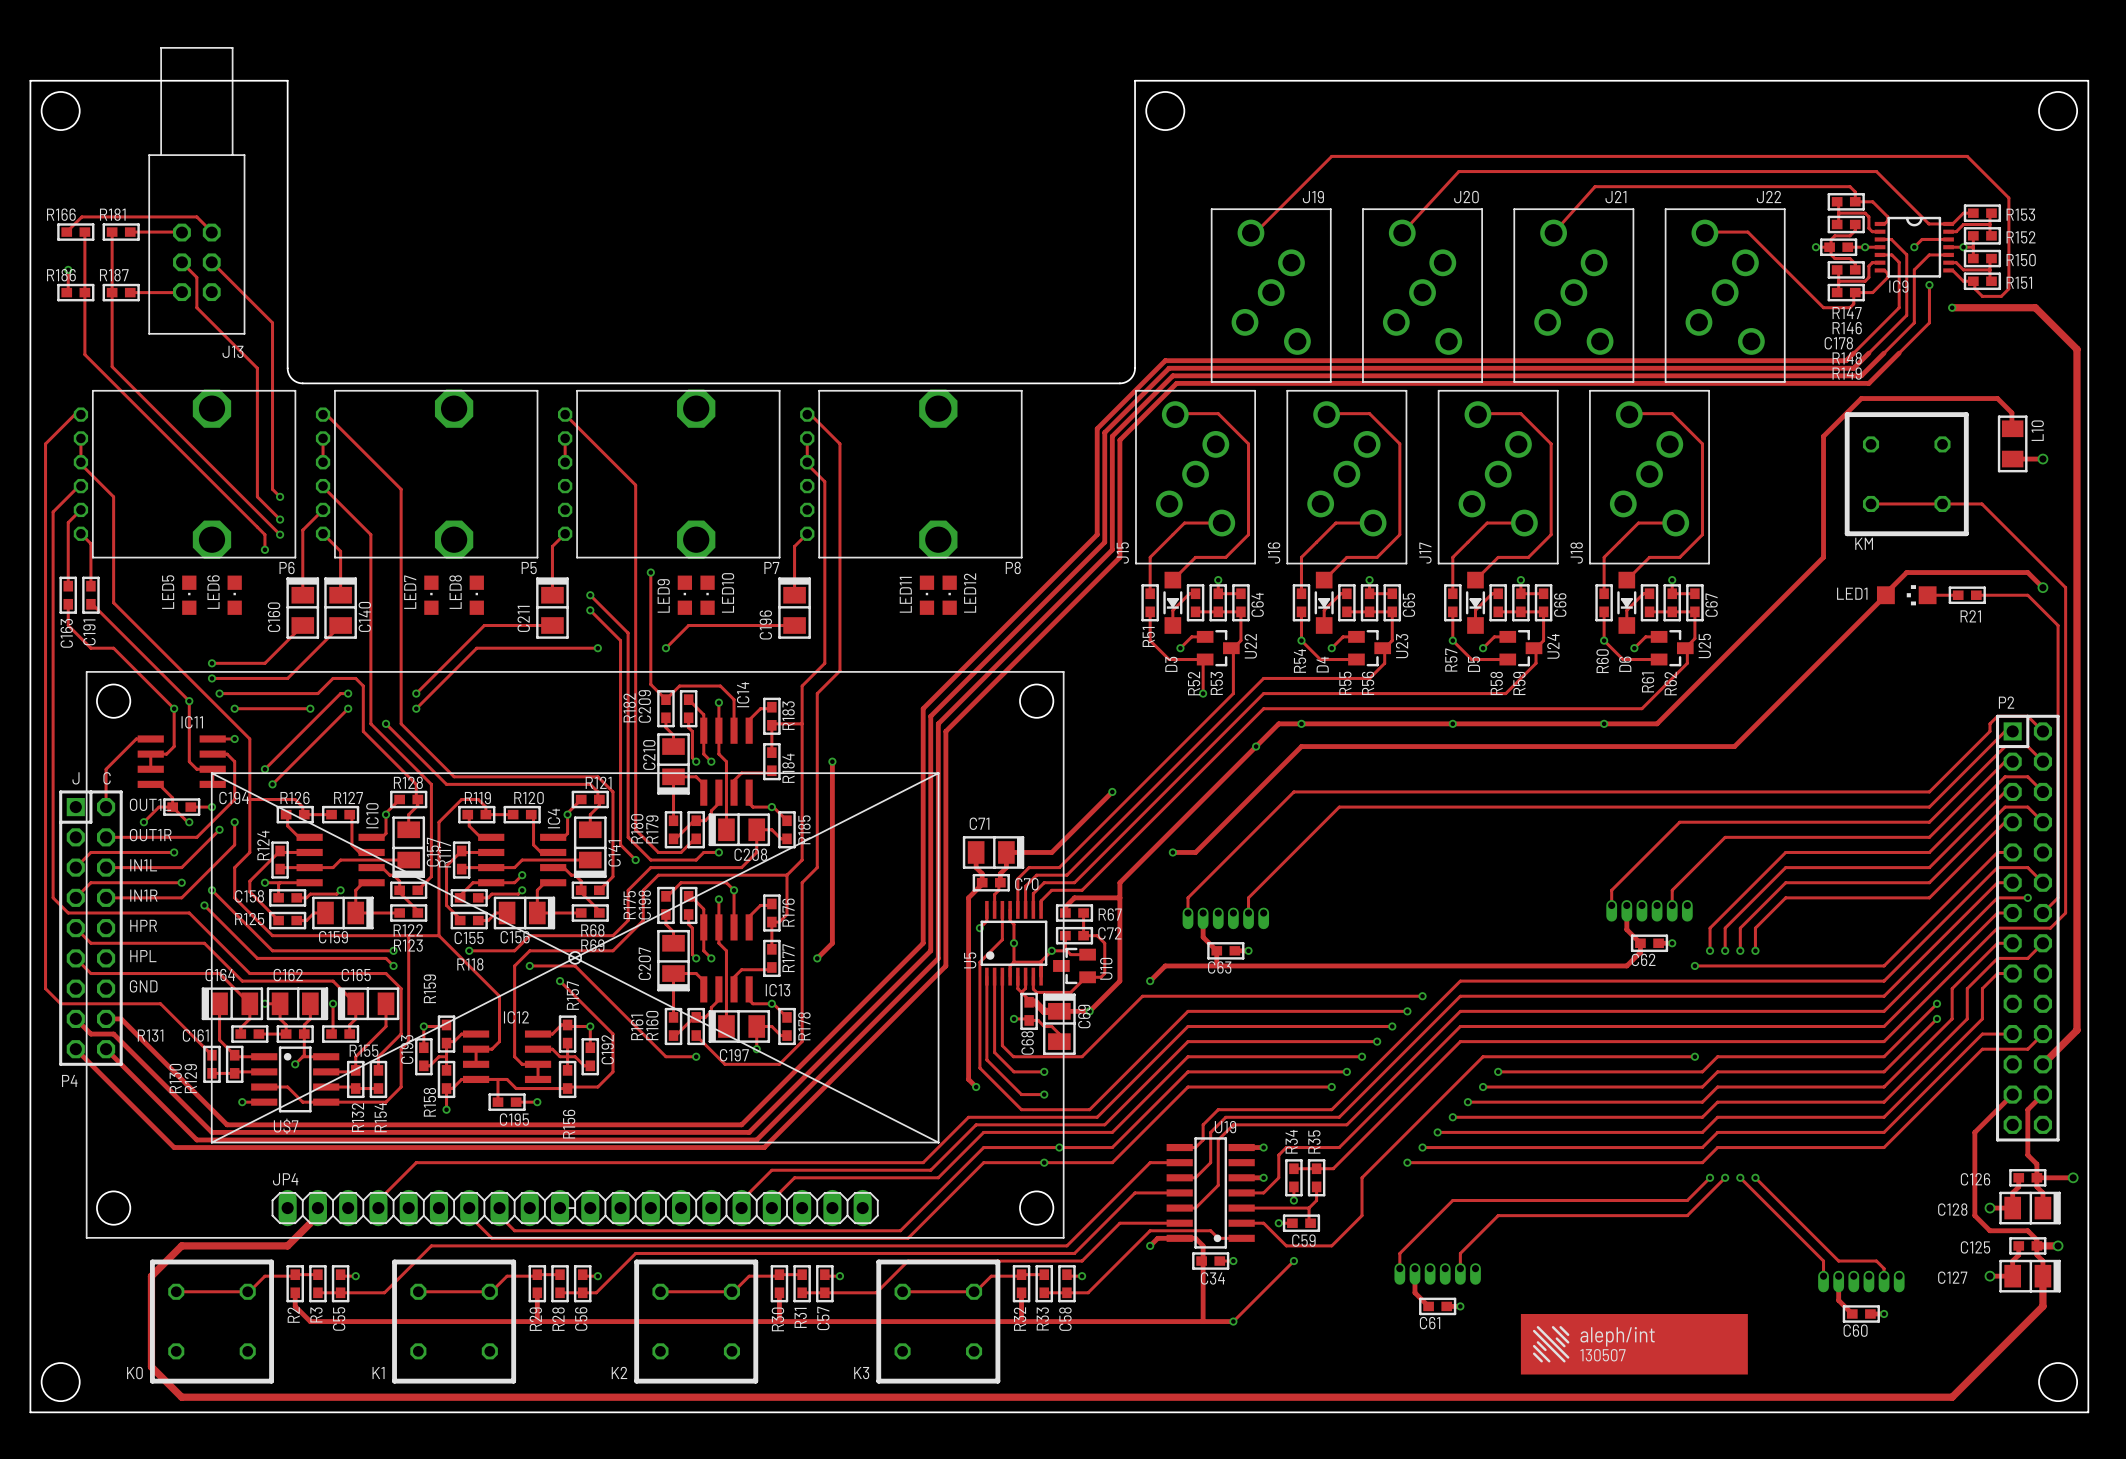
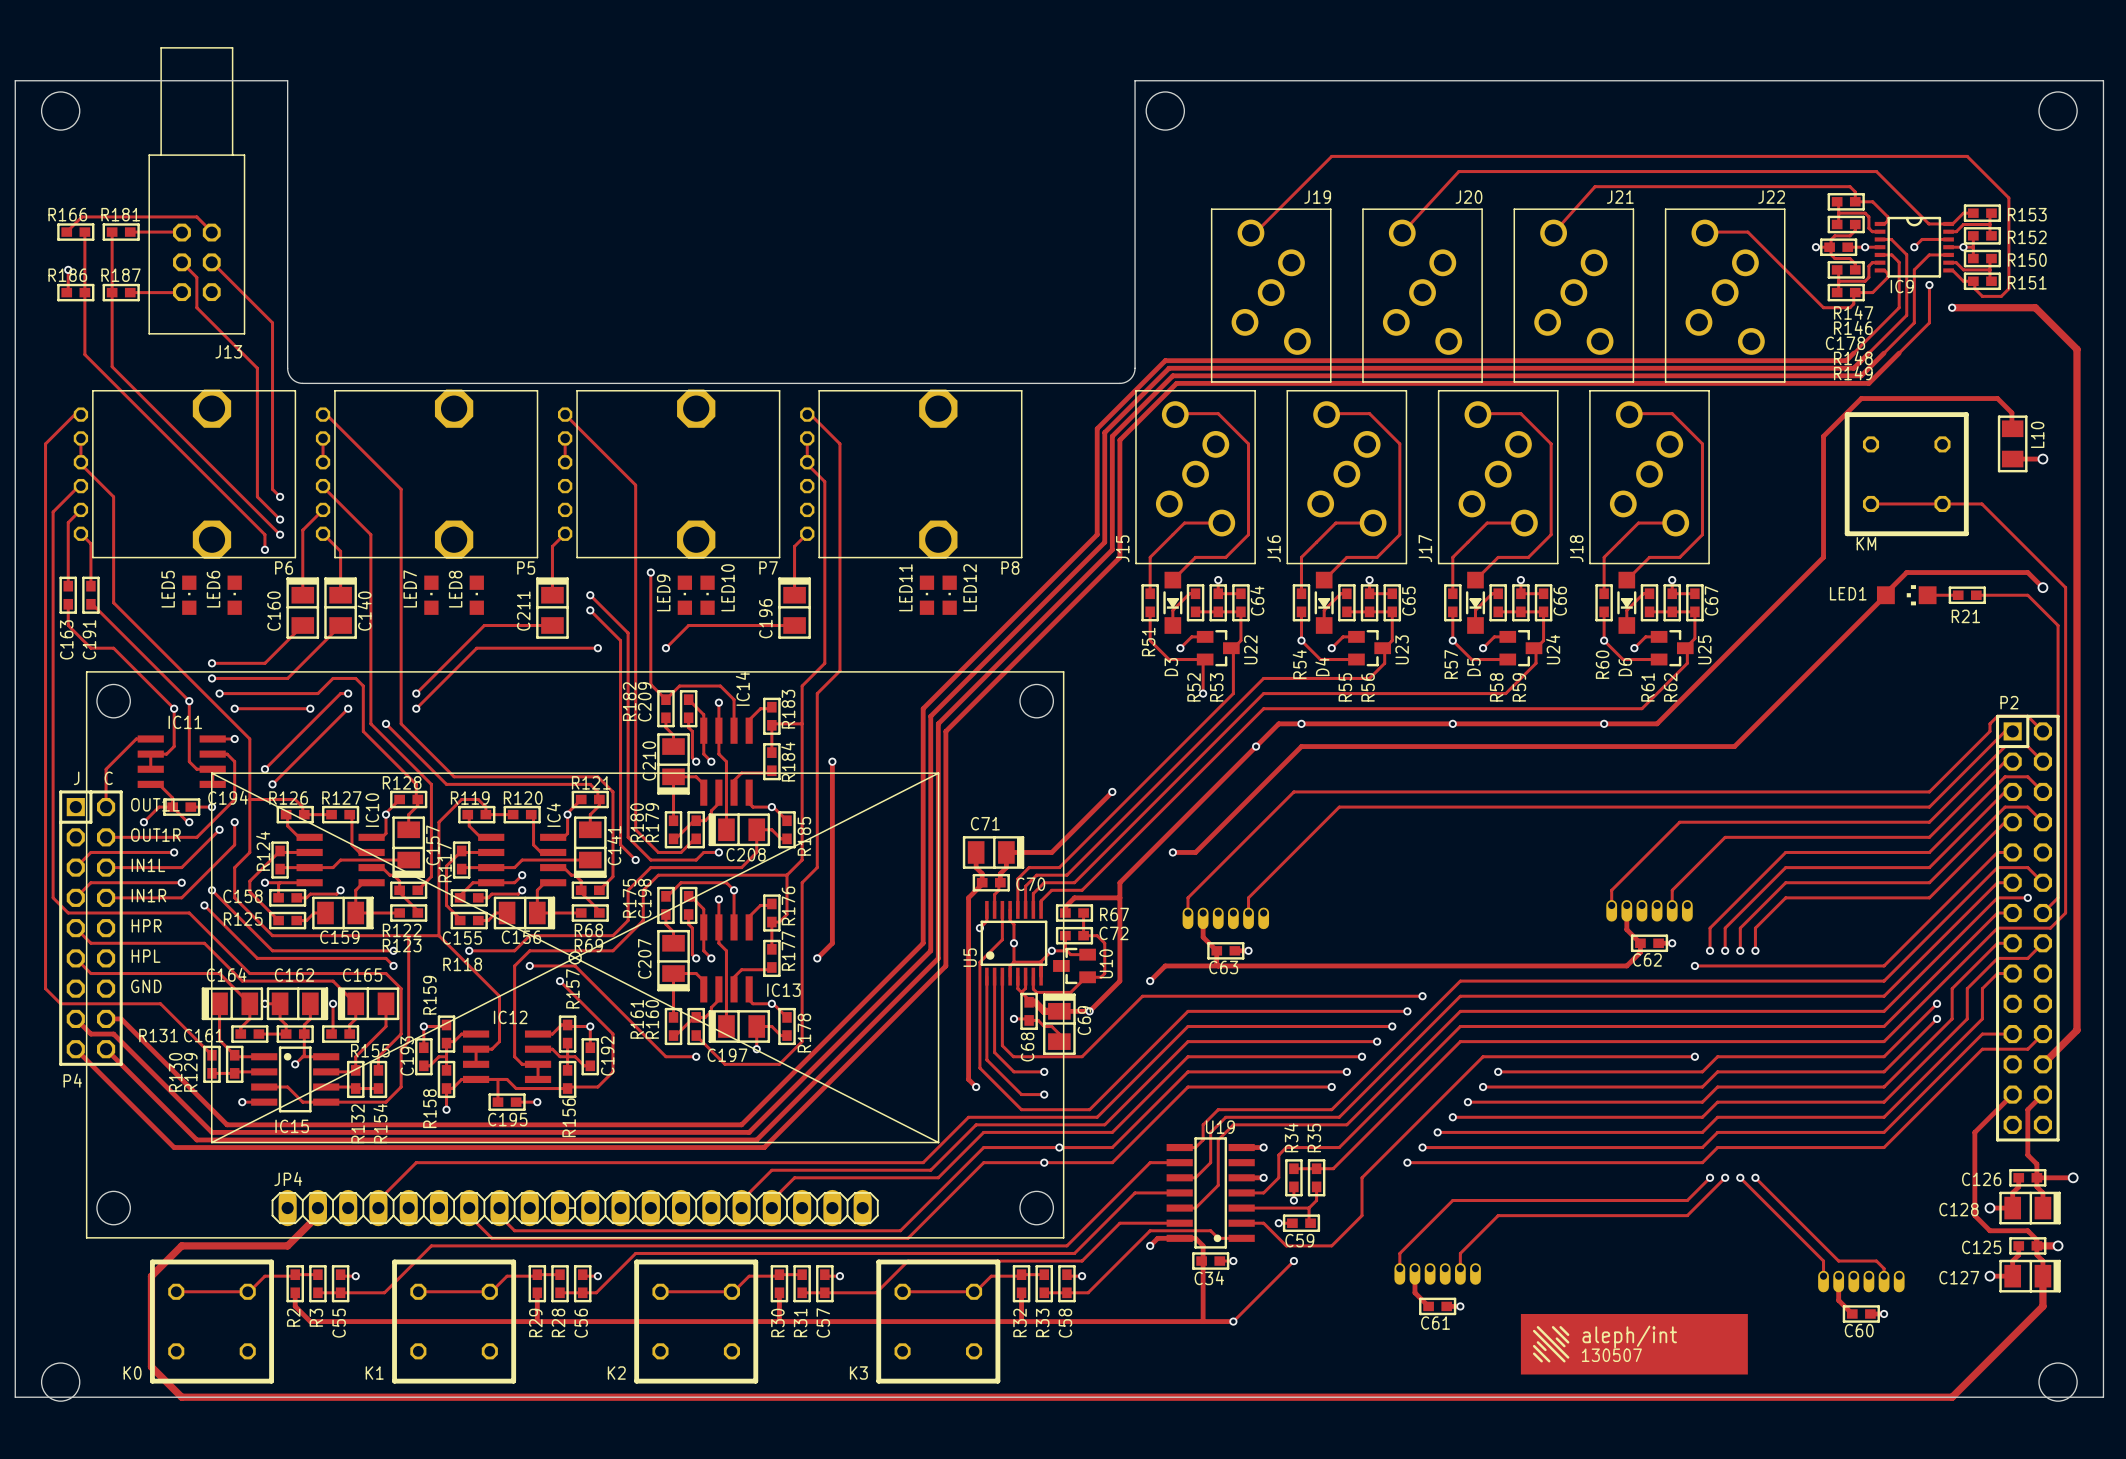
board edge: (30, 80) (30, 1412) (2088, 1412) (2088, 80) -> (30, 80) (15, 80) (15, 1397) (2103, 1397) (2103, 80) (2088, 80)
U$7 name: U$7 (286, 1126) -> IC15 (292, 1126)

